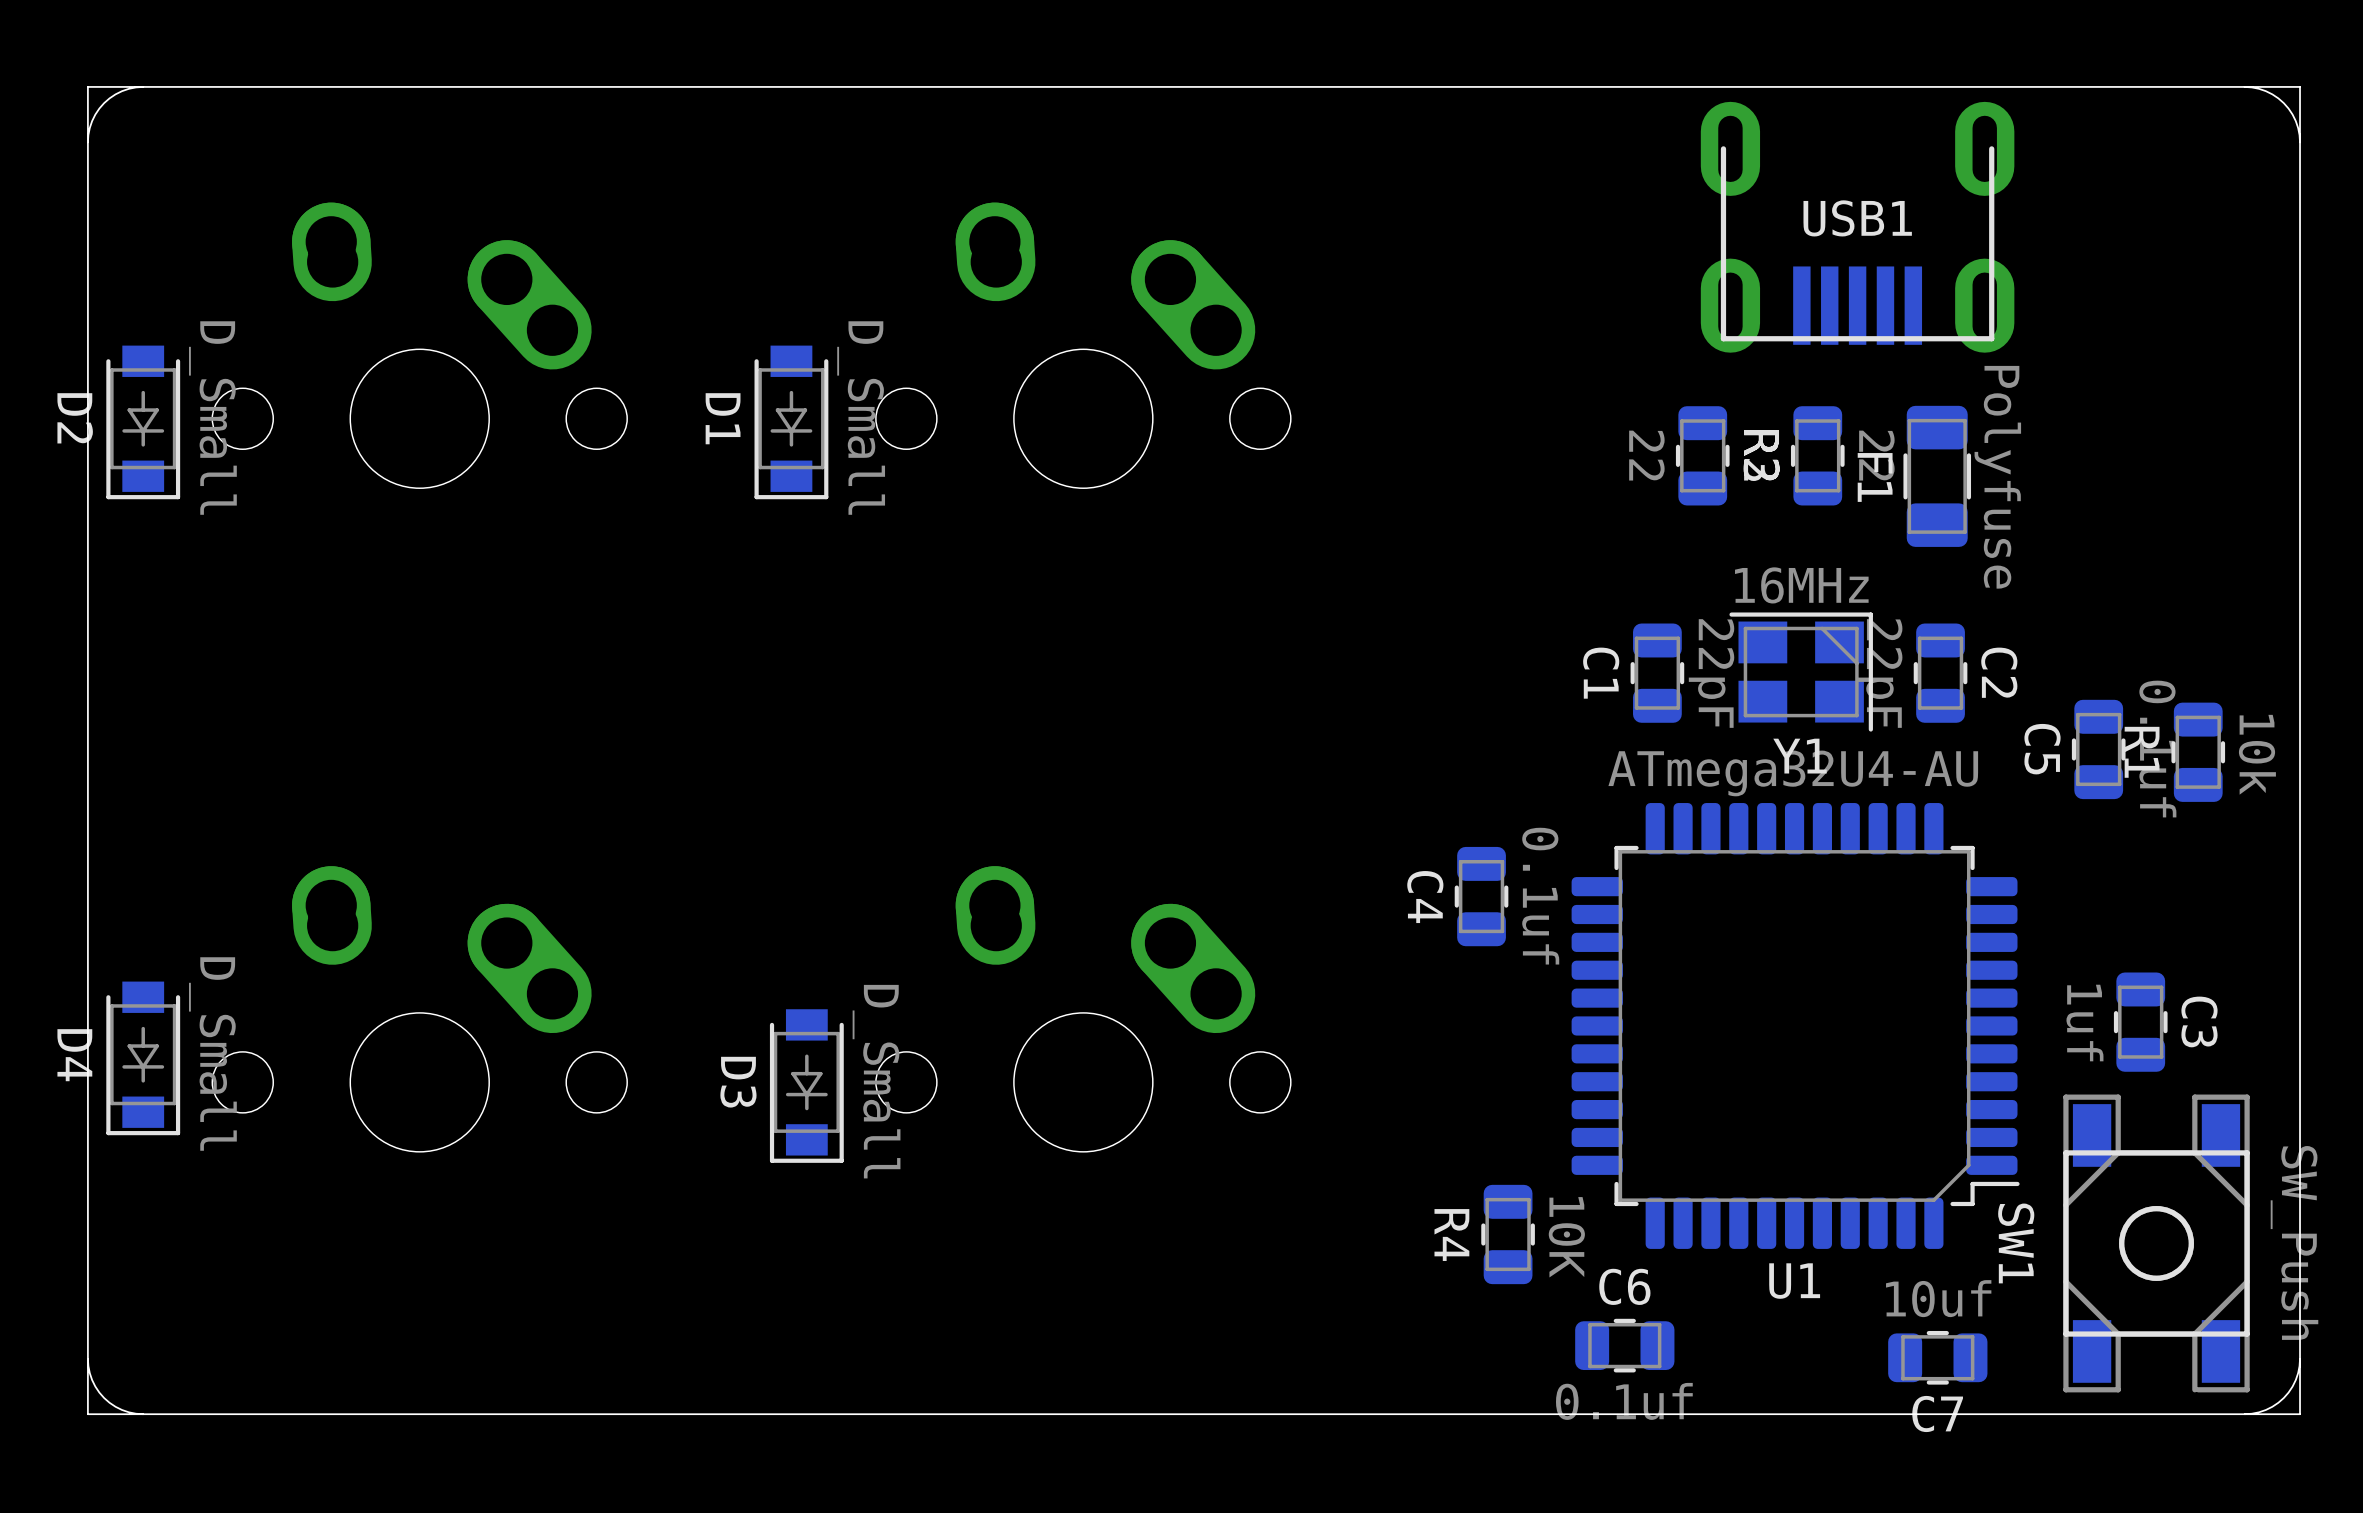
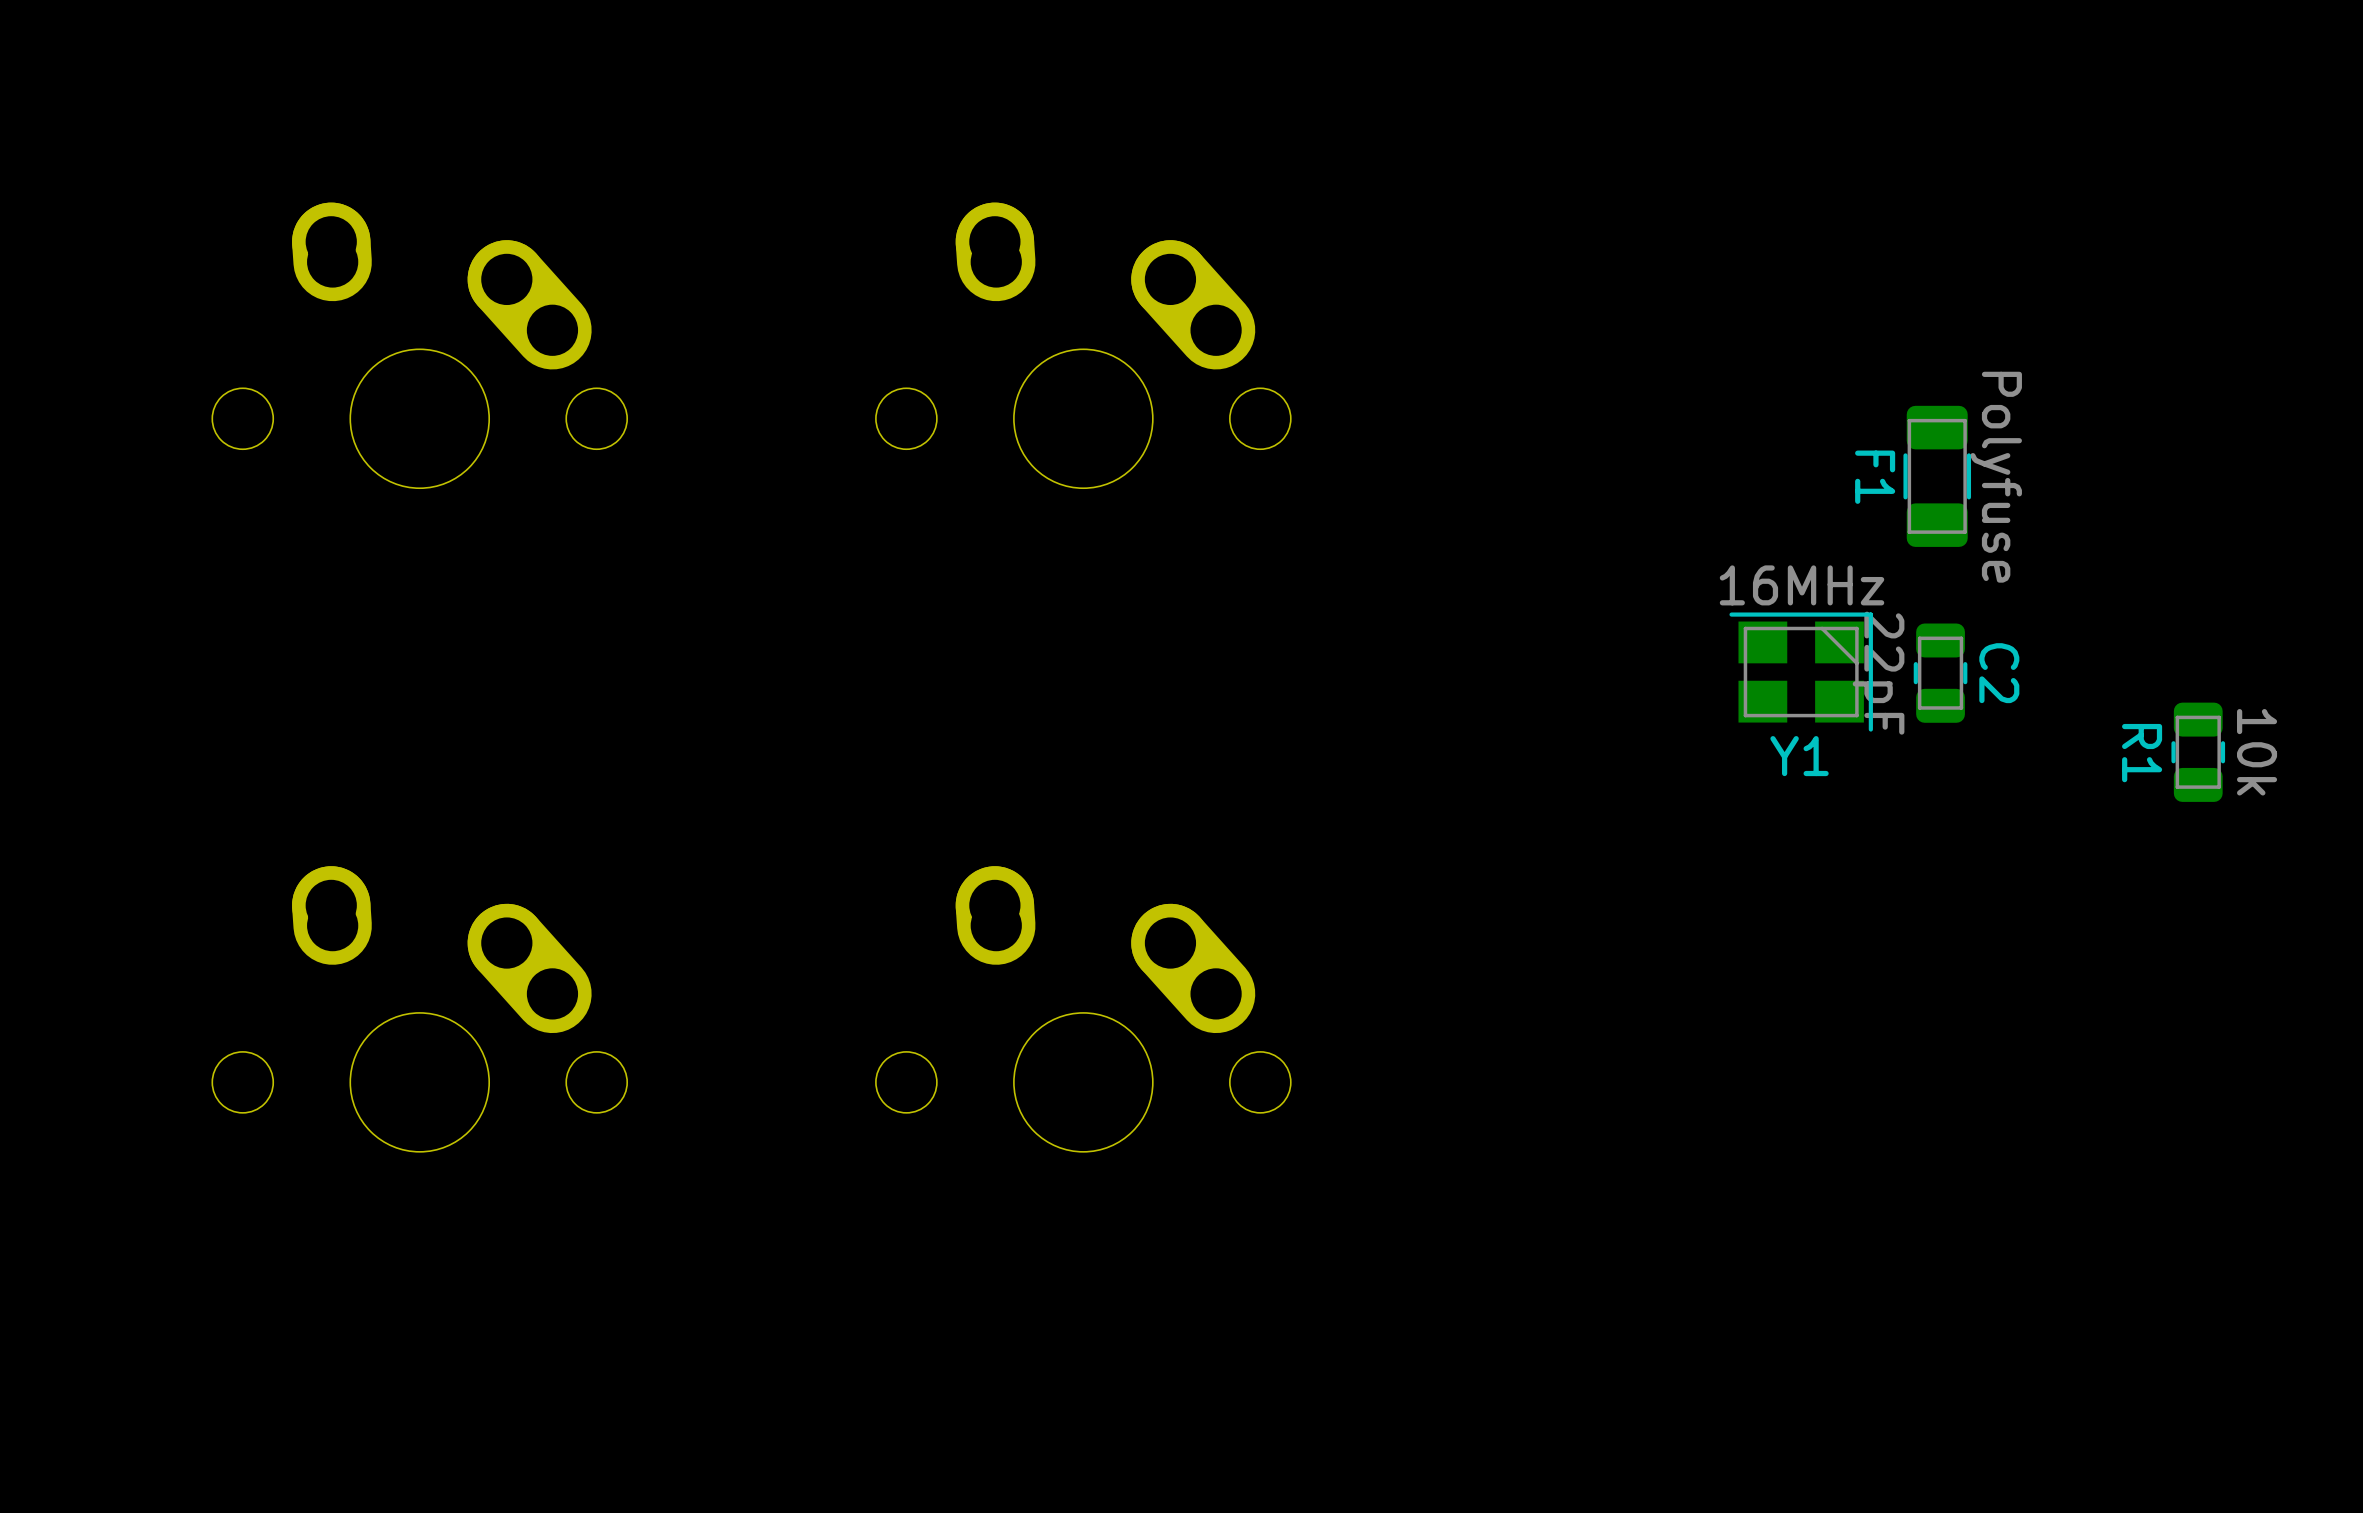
board edge: (143, 86) (122, 91) (104, 103) (92, 121) (87, 142) -> none
board edge: (2244, 86) (2265, 91) (2283, 103) (2295, 121) (2300, 142) -> none
board edge: (2300, 86) (2300, 1414) (87, 1414) (87, 86) (2300, 86) -> none
USB1: (1857, 227) -> none
D2: D_Small (143, 422) -> none
D1: D_Small (791, 422) -> none
part: 22 (1702, 455) -> none
part: 22 (1817, 455) -> none
C1: 22pF (1657, 673) -> none
C5: 0.1uf (2098, 749) -> none
C4: 0.1uf (1481, 896) -> none
C3: 1uf (2140, 1022) -> none
U1: ATmega32U4-AU (1795, 1025) -> none
D4: D_Small (143, 1058) -> none
D3: D_Small (806, 1086) -> none
R4: 10K (1508, 1234) -> none
SW1: SW_Push (2156, 1243) -> none
C6: 0.1uf (1624, 1345) -> none
C7: 10uf (1937, 1357) -> none
board edge: (87, 1358) (92, 1380) (104, 1398) (122, 1409) (143, 1414) -> none
board edge: (2300, 1358) (2295, 1380) (2283, 1398) (2265, 1409) (2244, 1414) -> none

